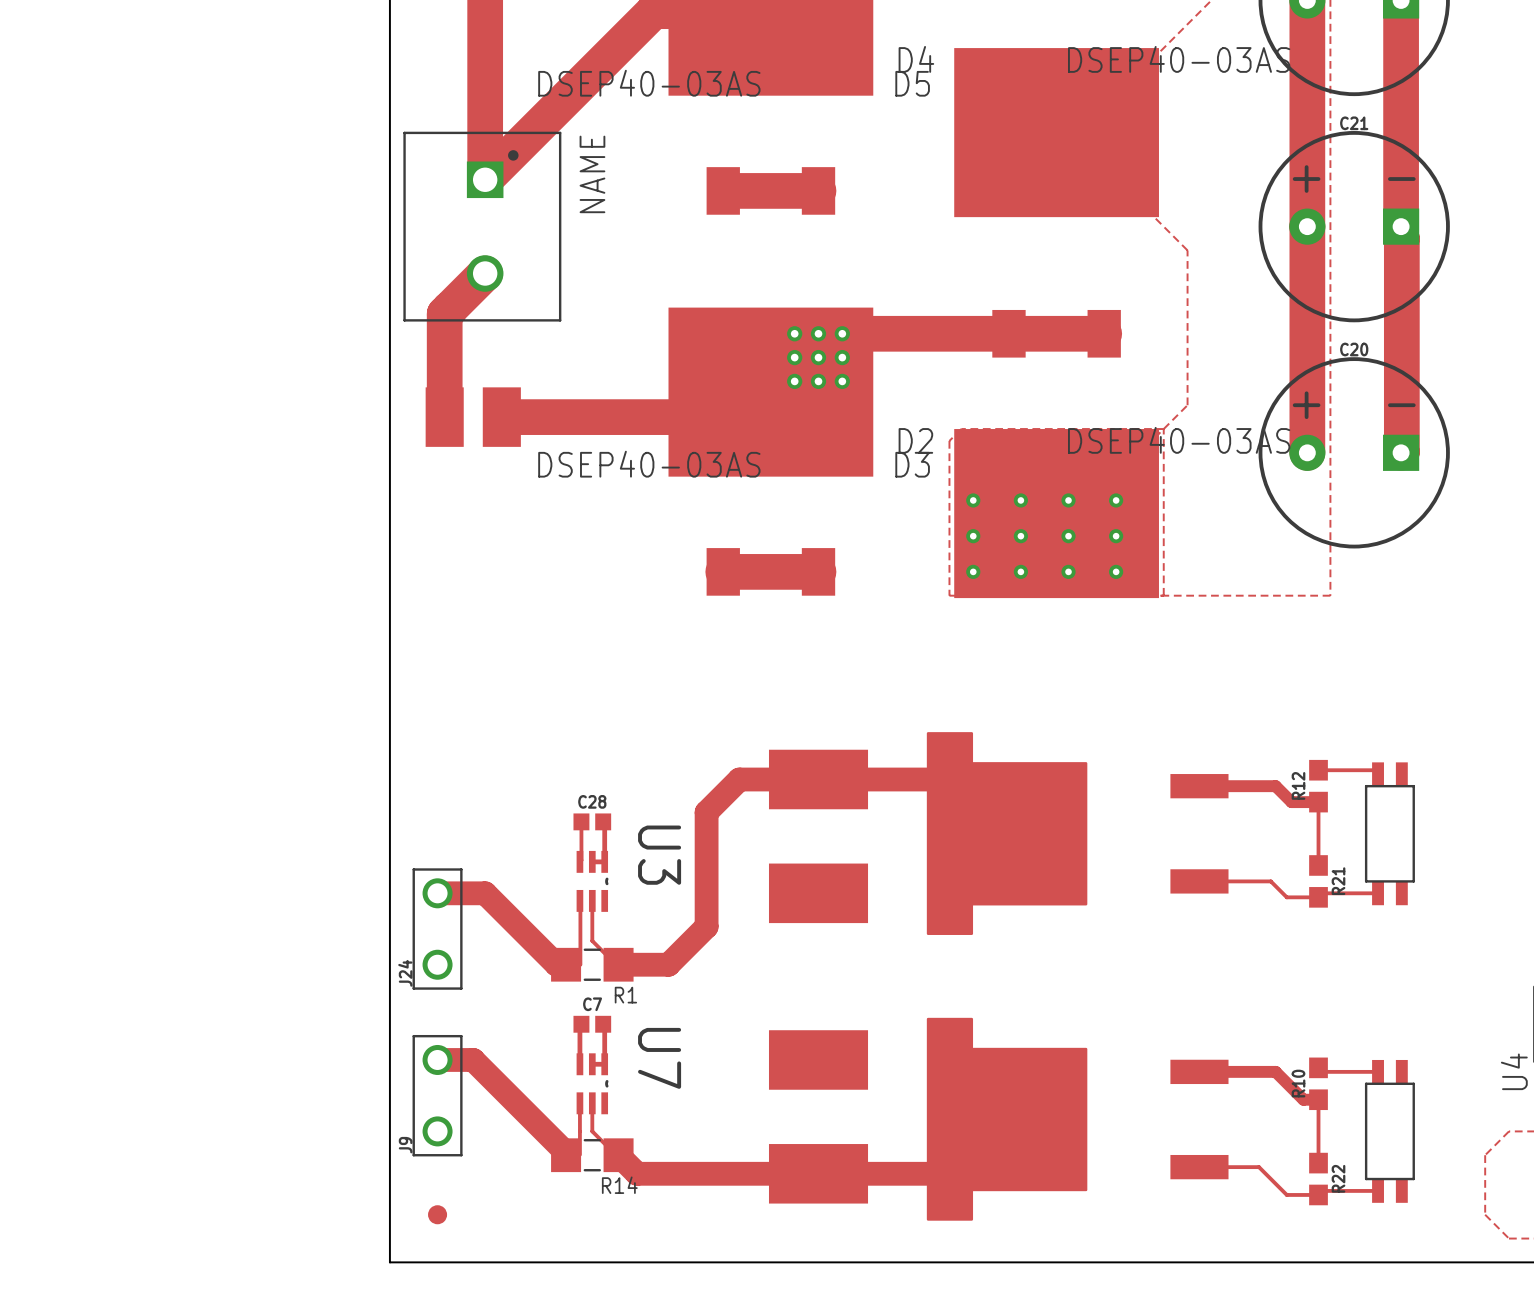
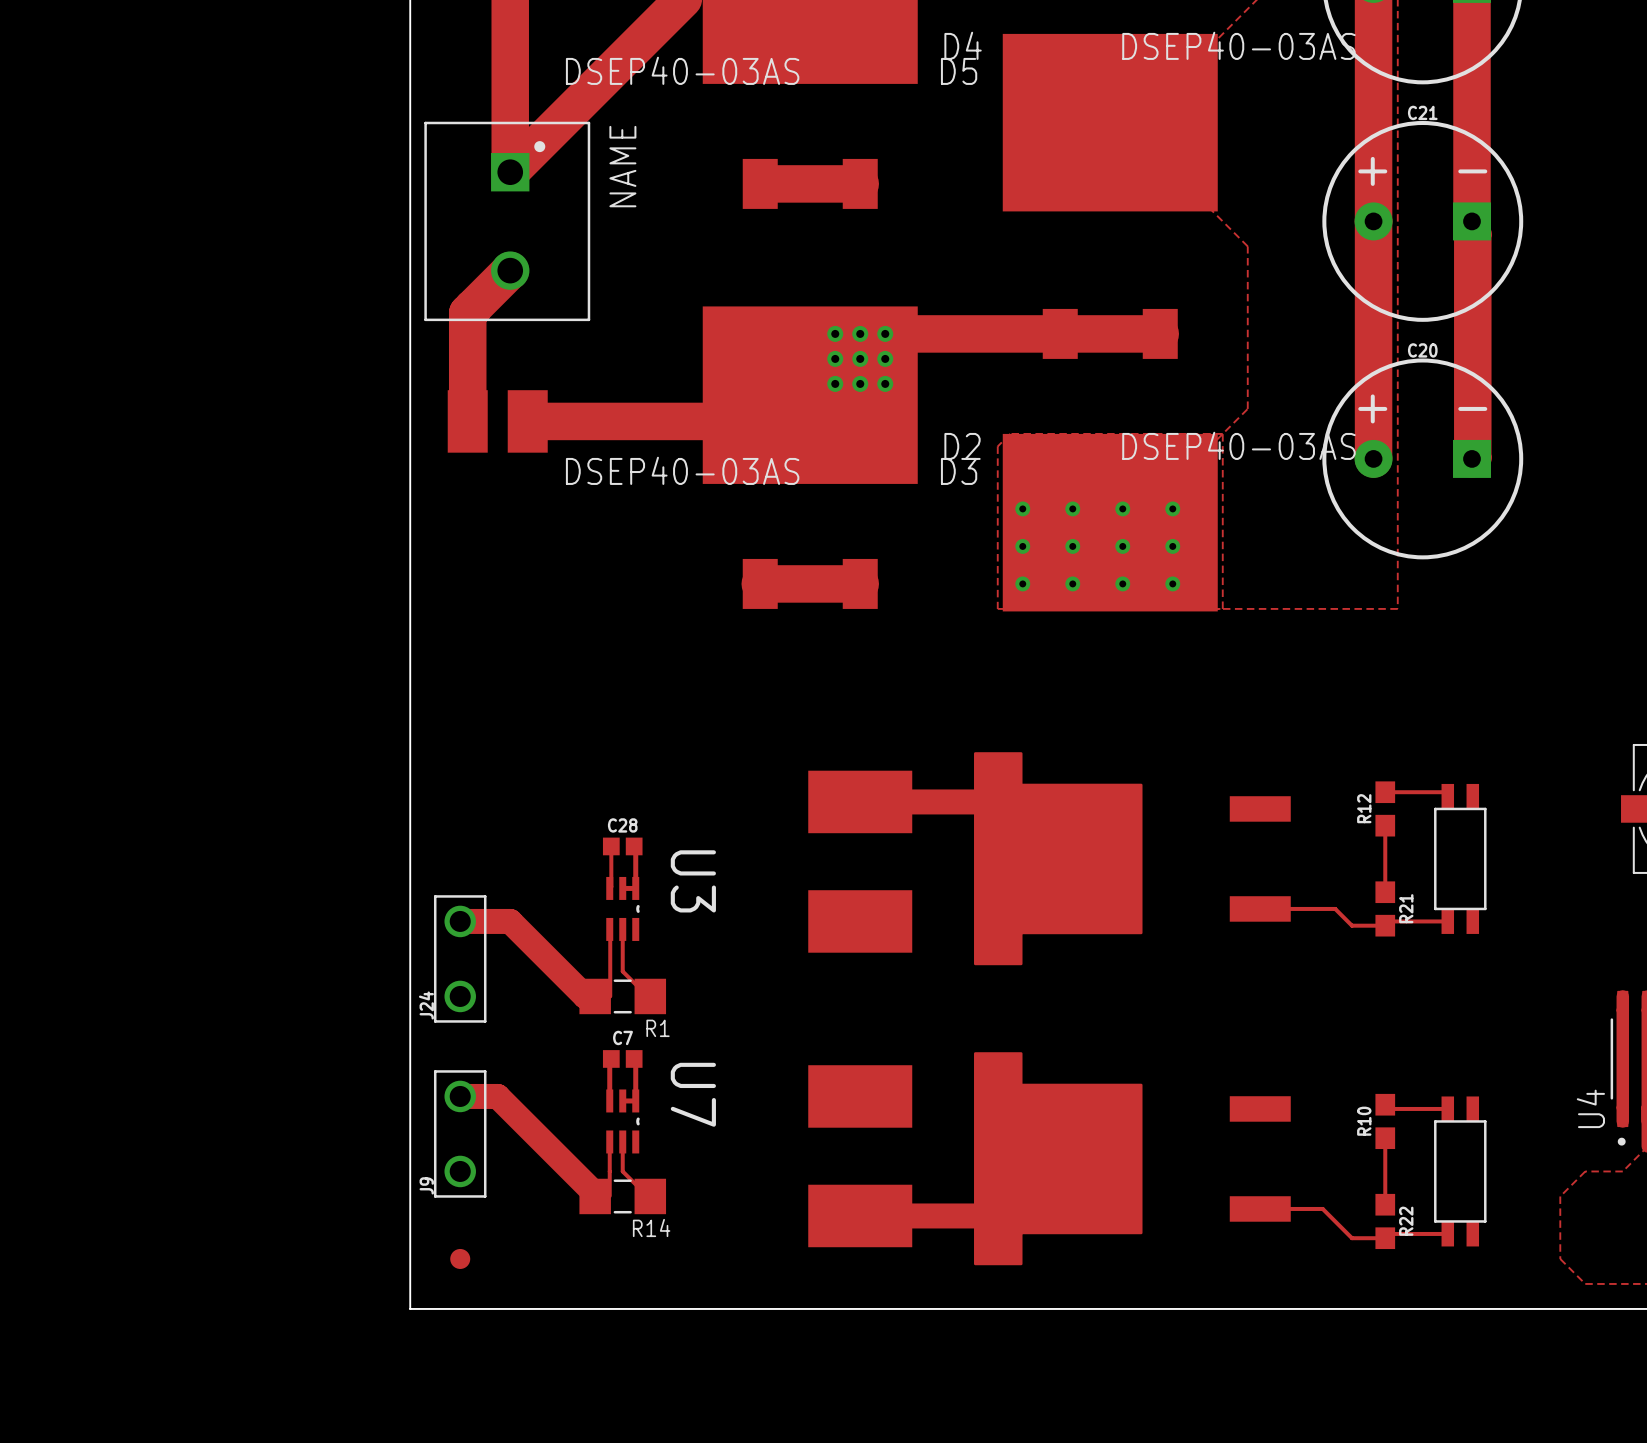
track: (818, 779) (739, 779) (706, 812) (706, 926) (668, 964) (618, 964) -> none
track: (1199, 786) (1275, 786) (1291, 802) (1318, 802) -> none
track: (1199, 1071) (1275, 1071) (1303, 1099) (1318, 1099) -> none
track: (618, 1155) (637, 1173) (818, 1173) -> none

